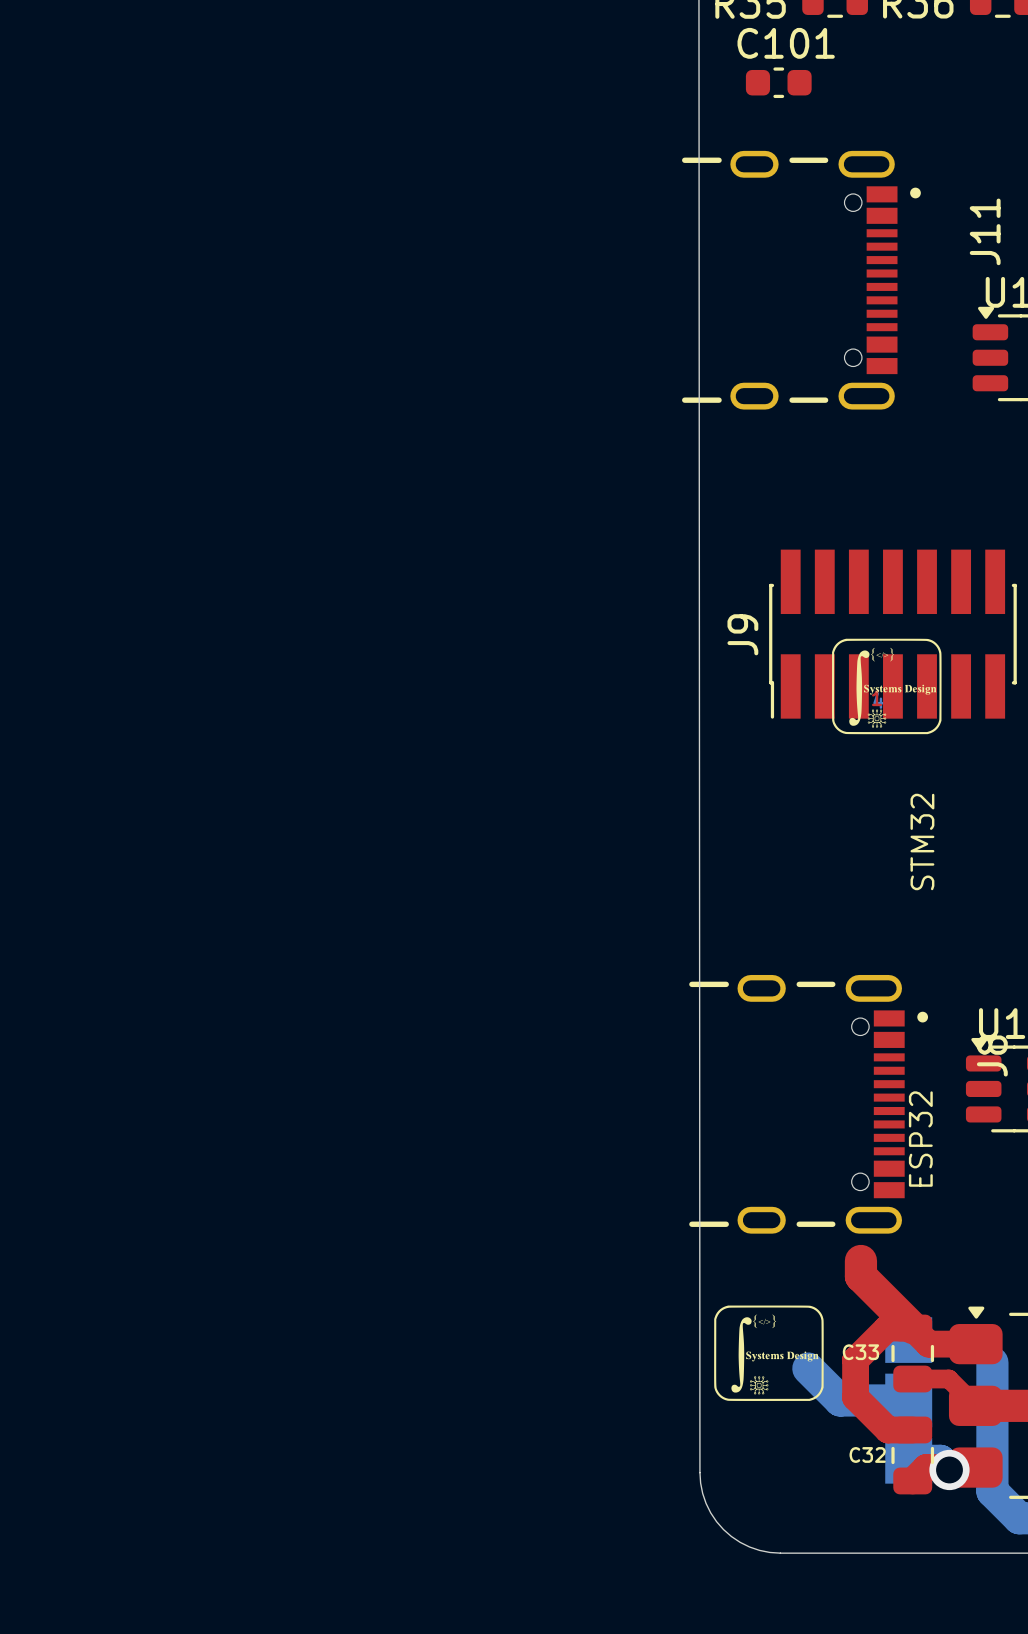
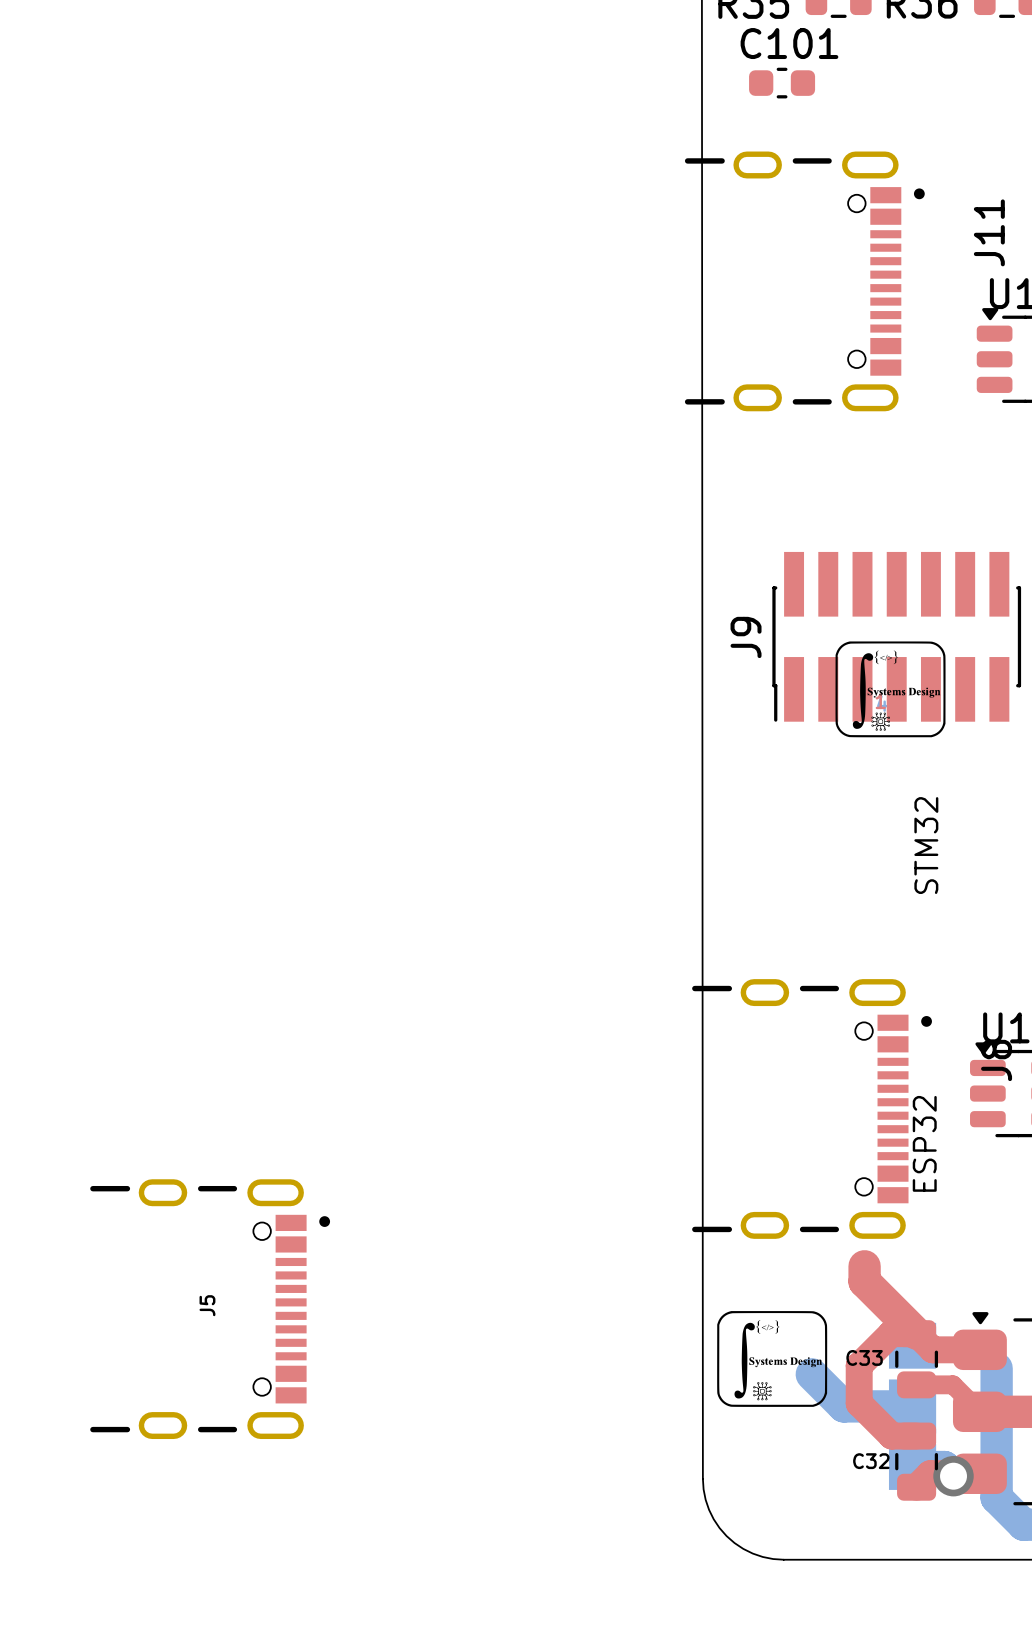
J5: none -> (210, 1309)

